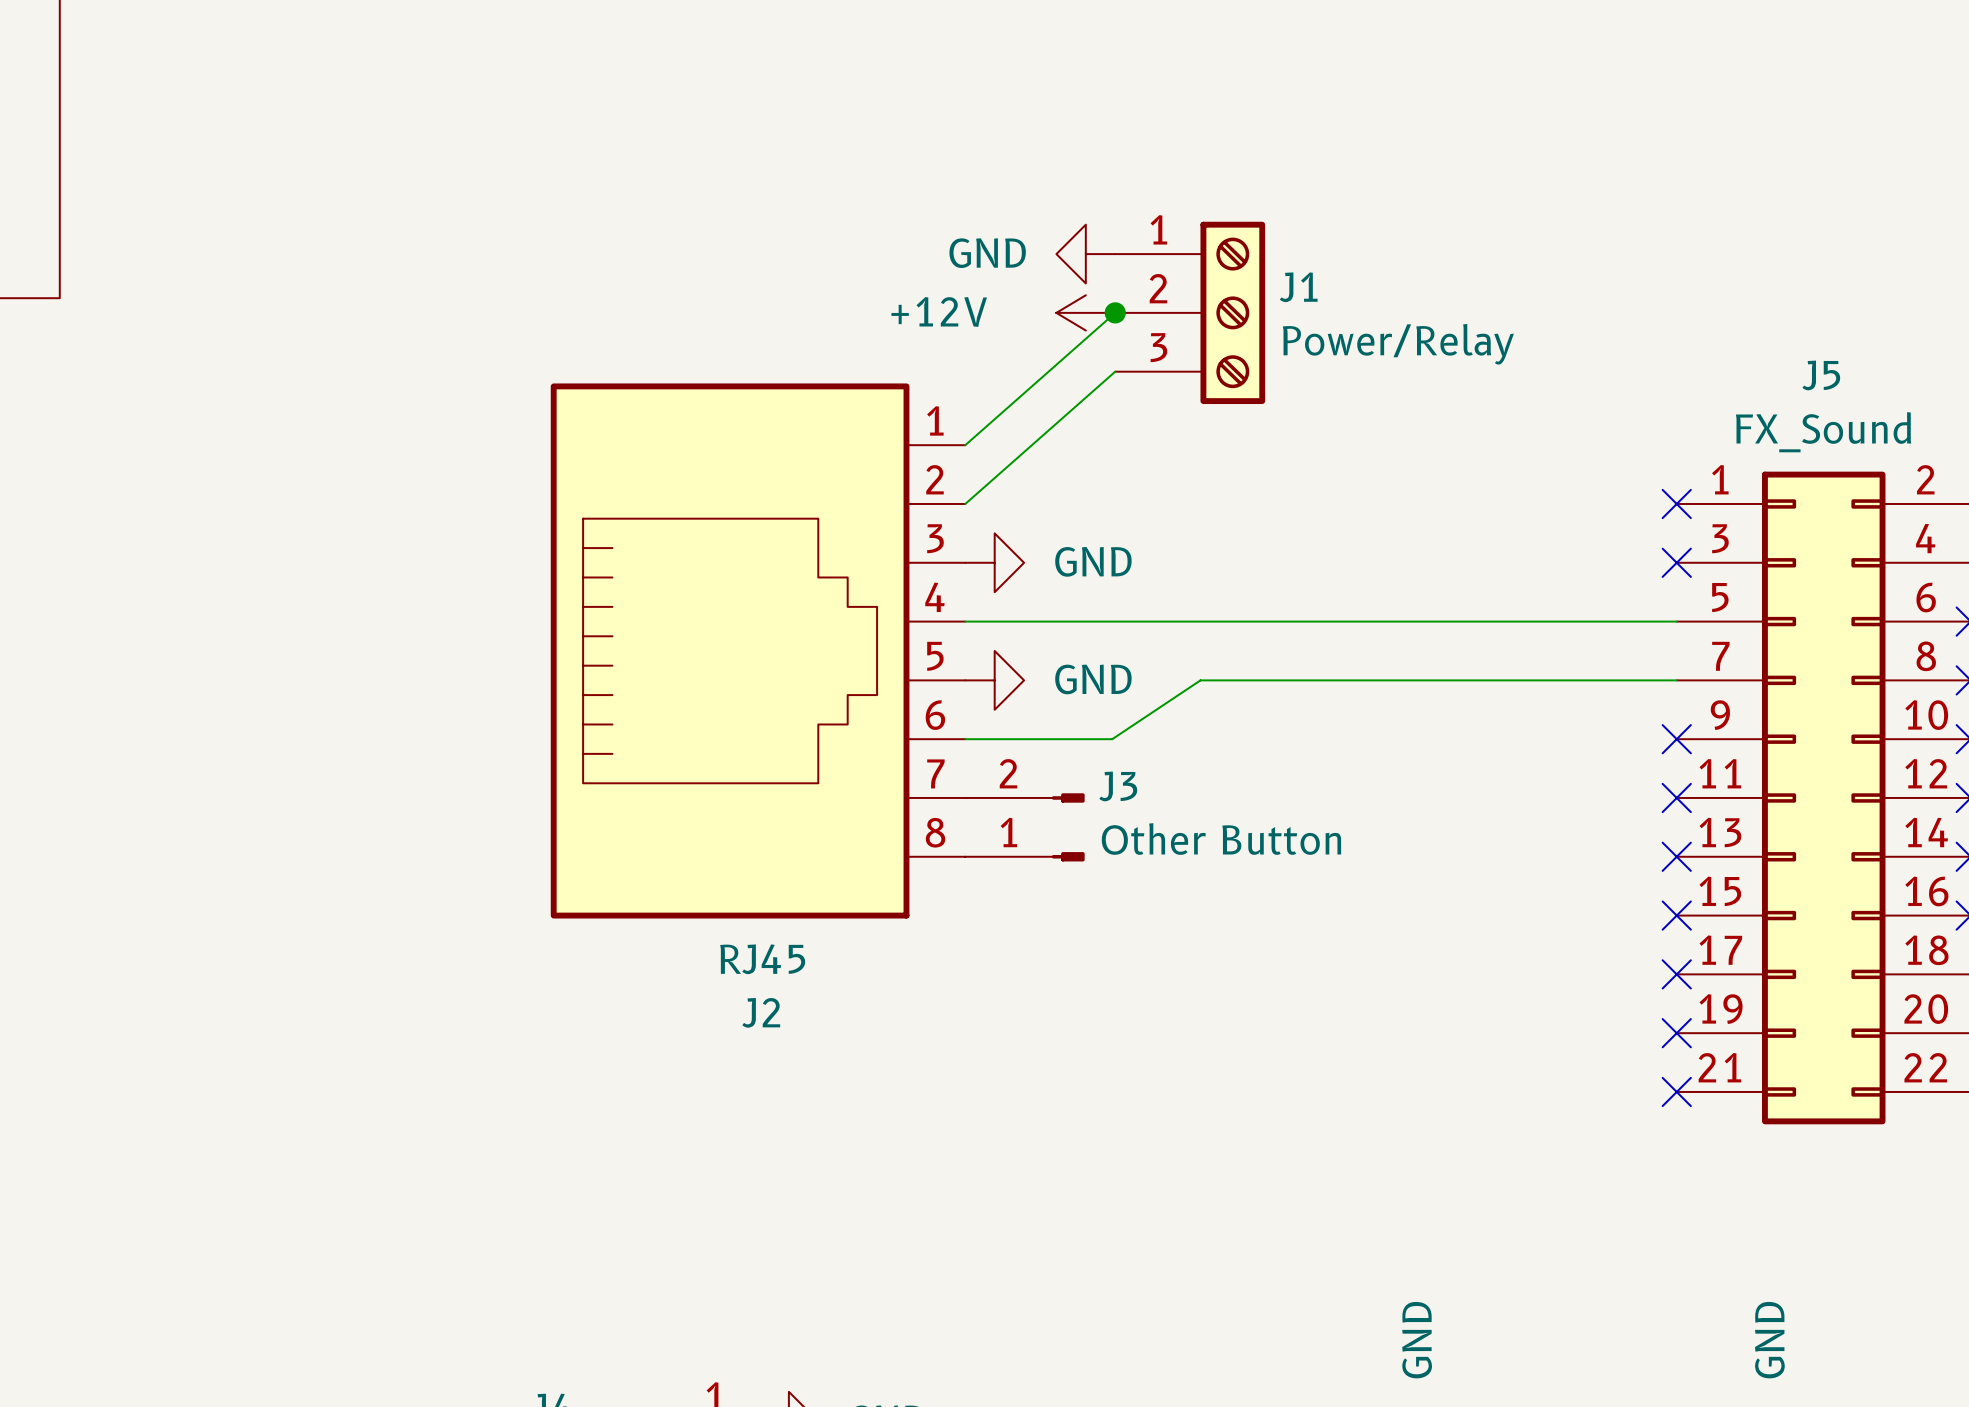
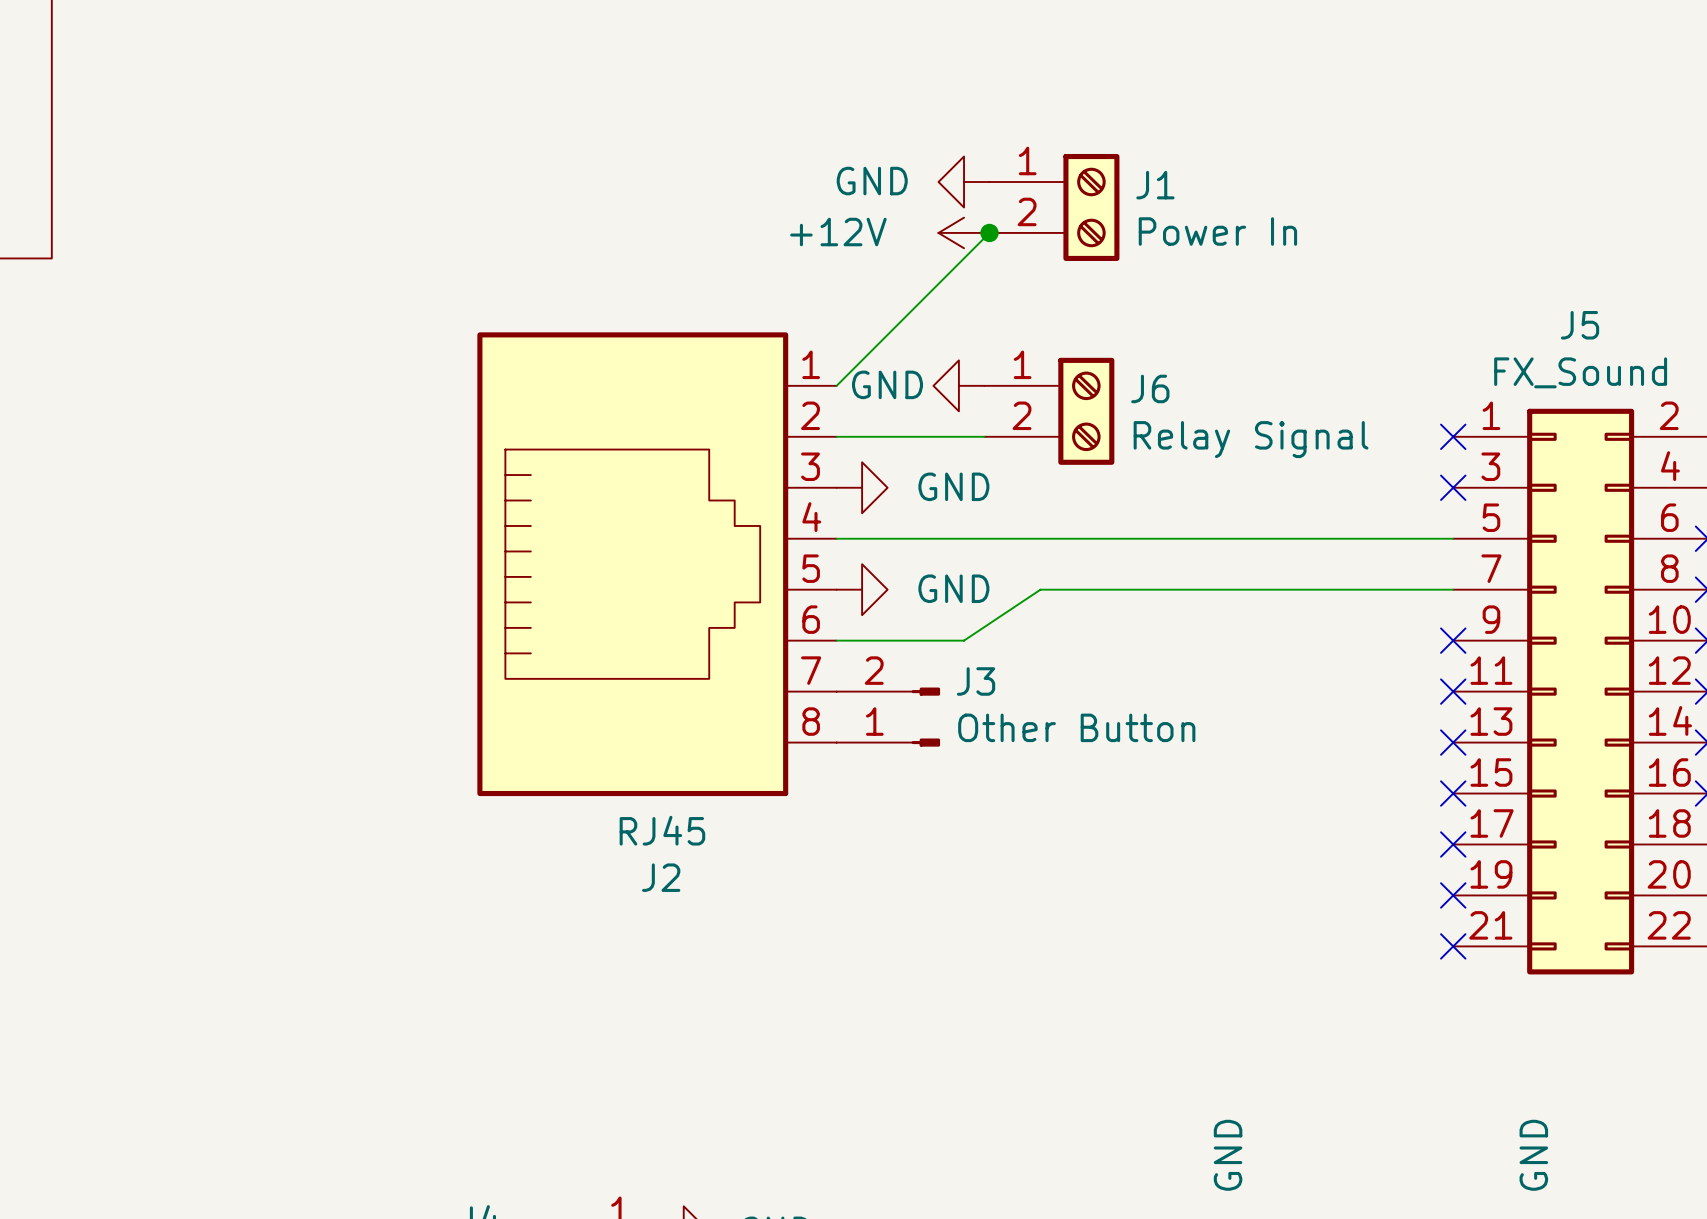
J1 symbol: [1115, 221, 1266, 405] -> [989, 153, 1120, 261]
power symbol position: GND (1085, 254) -> GND (964, 182)
power symbol position: +12V (1085, 312) -> +12V (964, 232)
wire: (1115, 312) (965, 445) -> (989, 232) (836, 385)
junction position: (1115, 312) -> (989, 232)
J1 value: Power/Relay (1398, 344) -> Power In (1217, 231)
wire: (1115, 371) (965, 503) -> (984, 436) (836, 436)
power symbol: none -> GND (958, 385)
J6: none -> Relay Signal (1049, 411)

